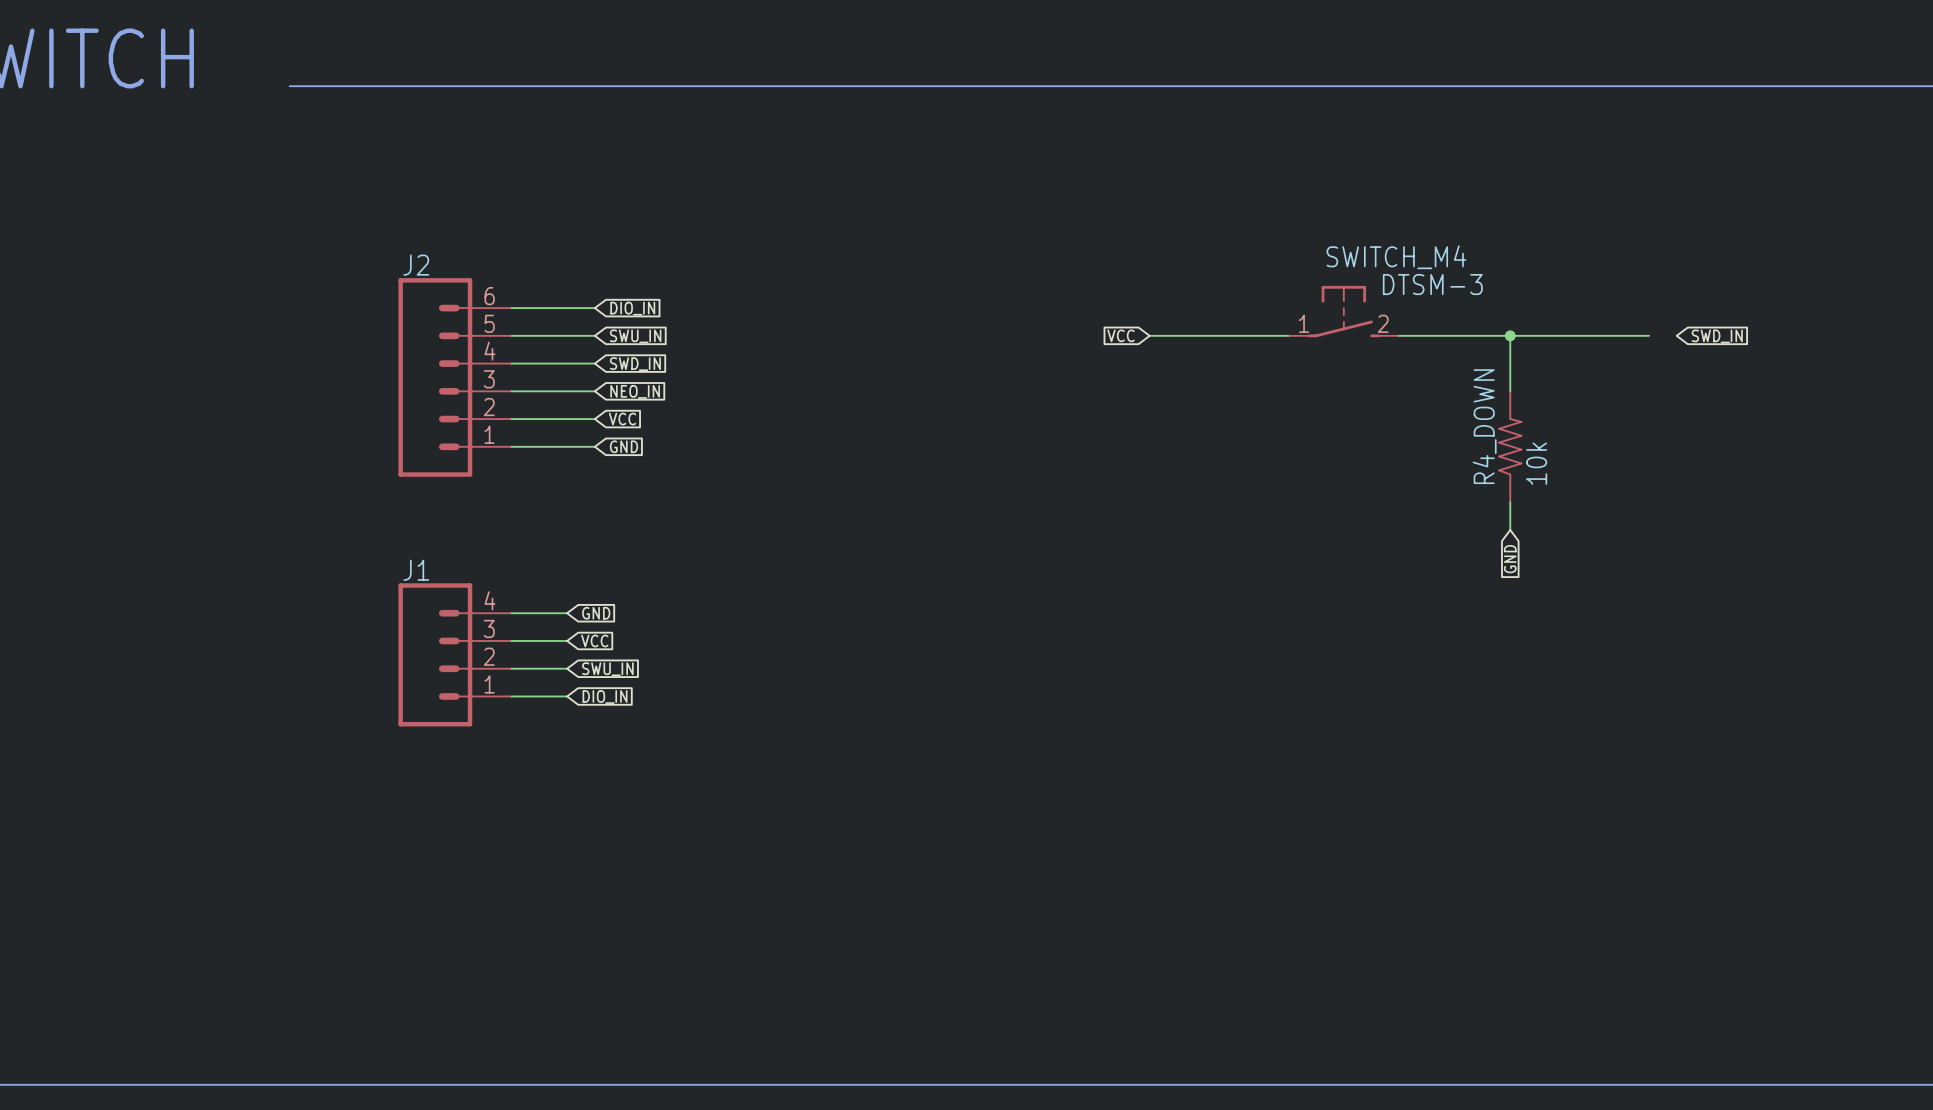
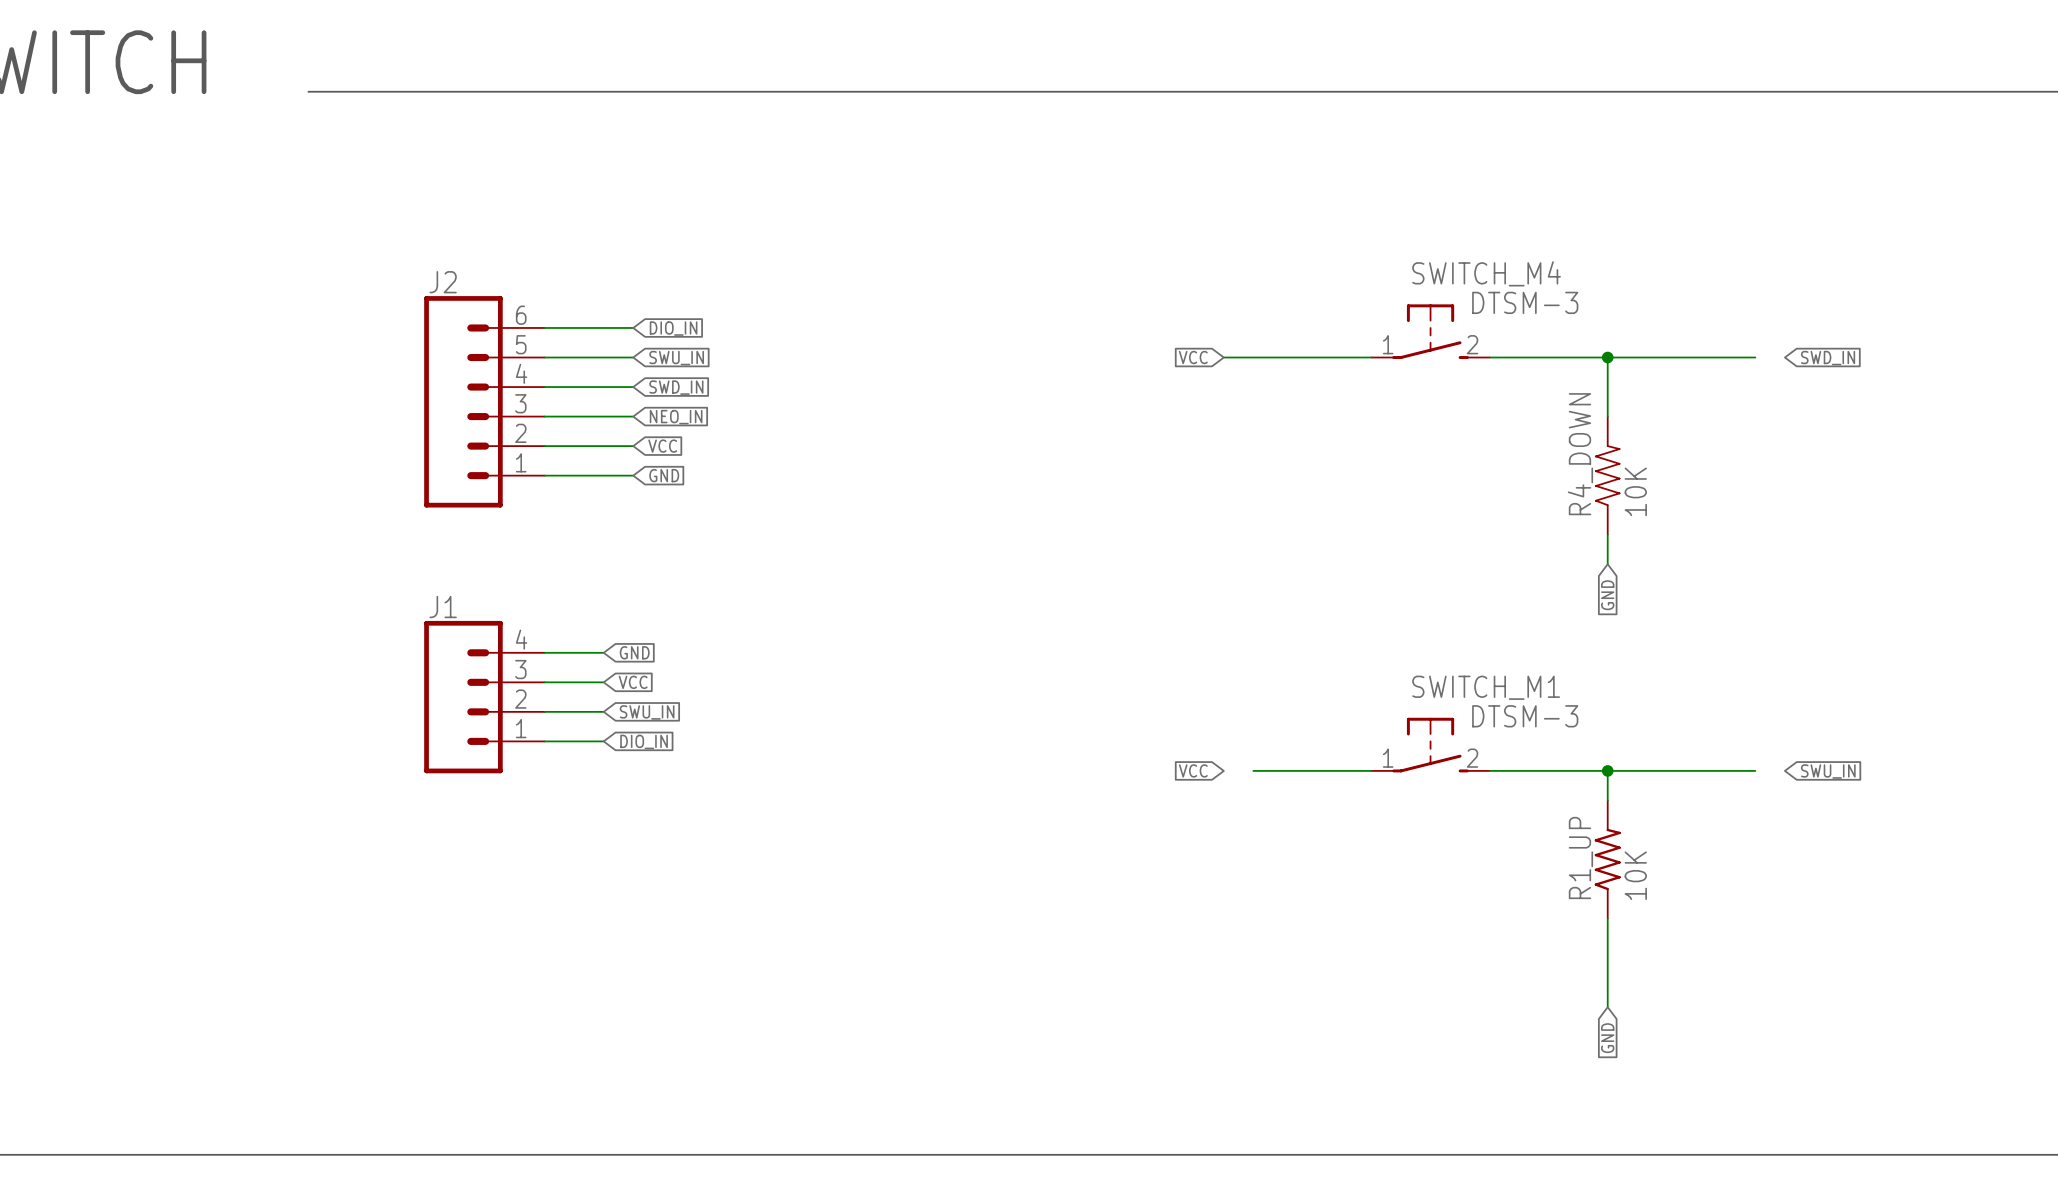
R4_DOWN value: 10k (1536, 463) -> 10K (1635, 491)
SWITCH_M1: none -> DTSM-3 (1430, 745)
global label: none -> VCC (1193, 770)
wire: none -> (1253, 770) (1371, 770)
wire: none -> (1489, 770) (1755, 770)
wire: none -> (1607, 770) (1607, 800)
junction: none -> (1607, 770)
global label: none -> SWU_IN (1828, 771)
R1_UP: none -> 10K (1607, 859)
wire: none -> (1607, 918) (1607, 1007)
global label: none -> GND (1607, 1038)

